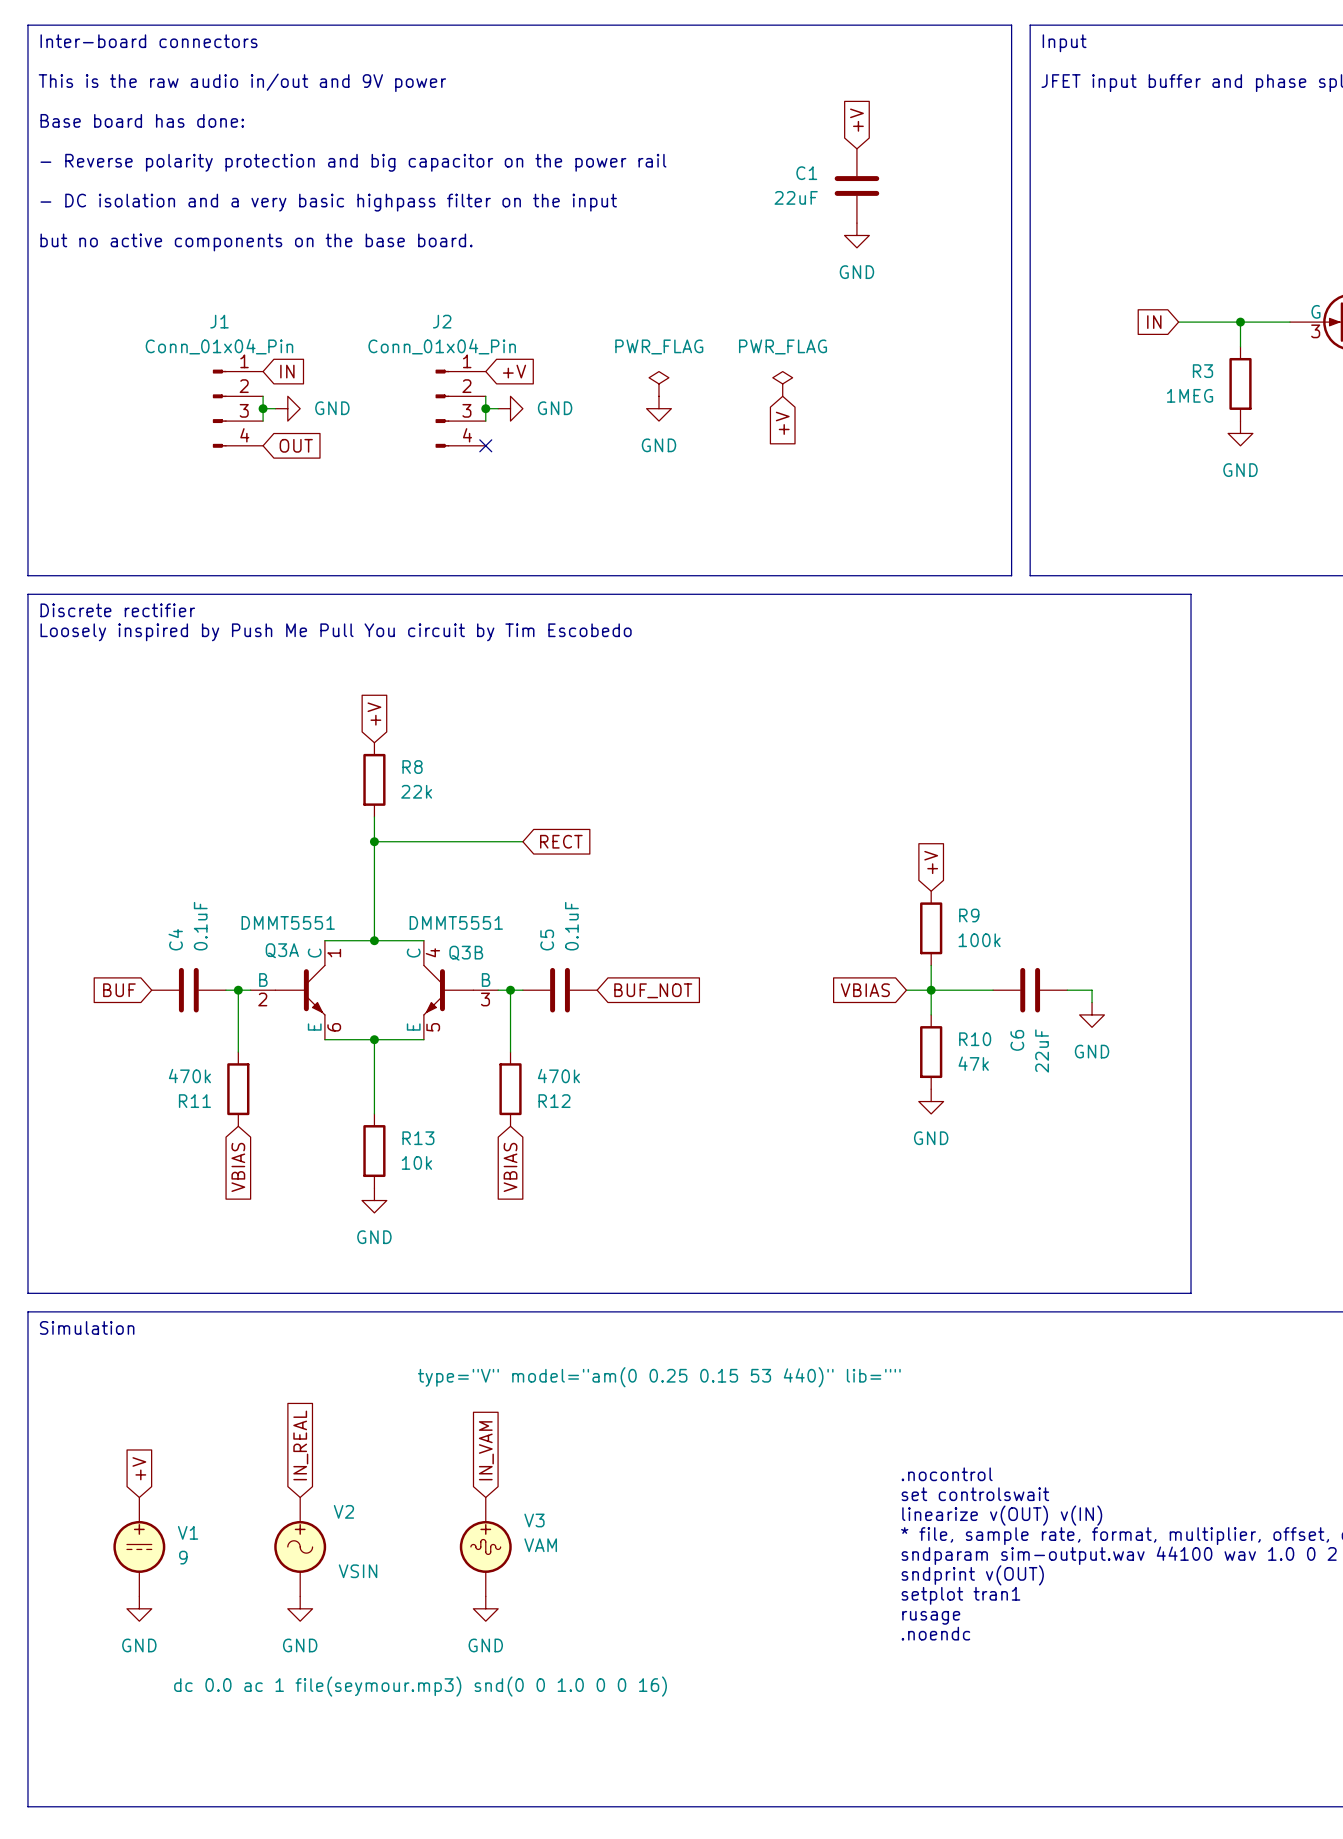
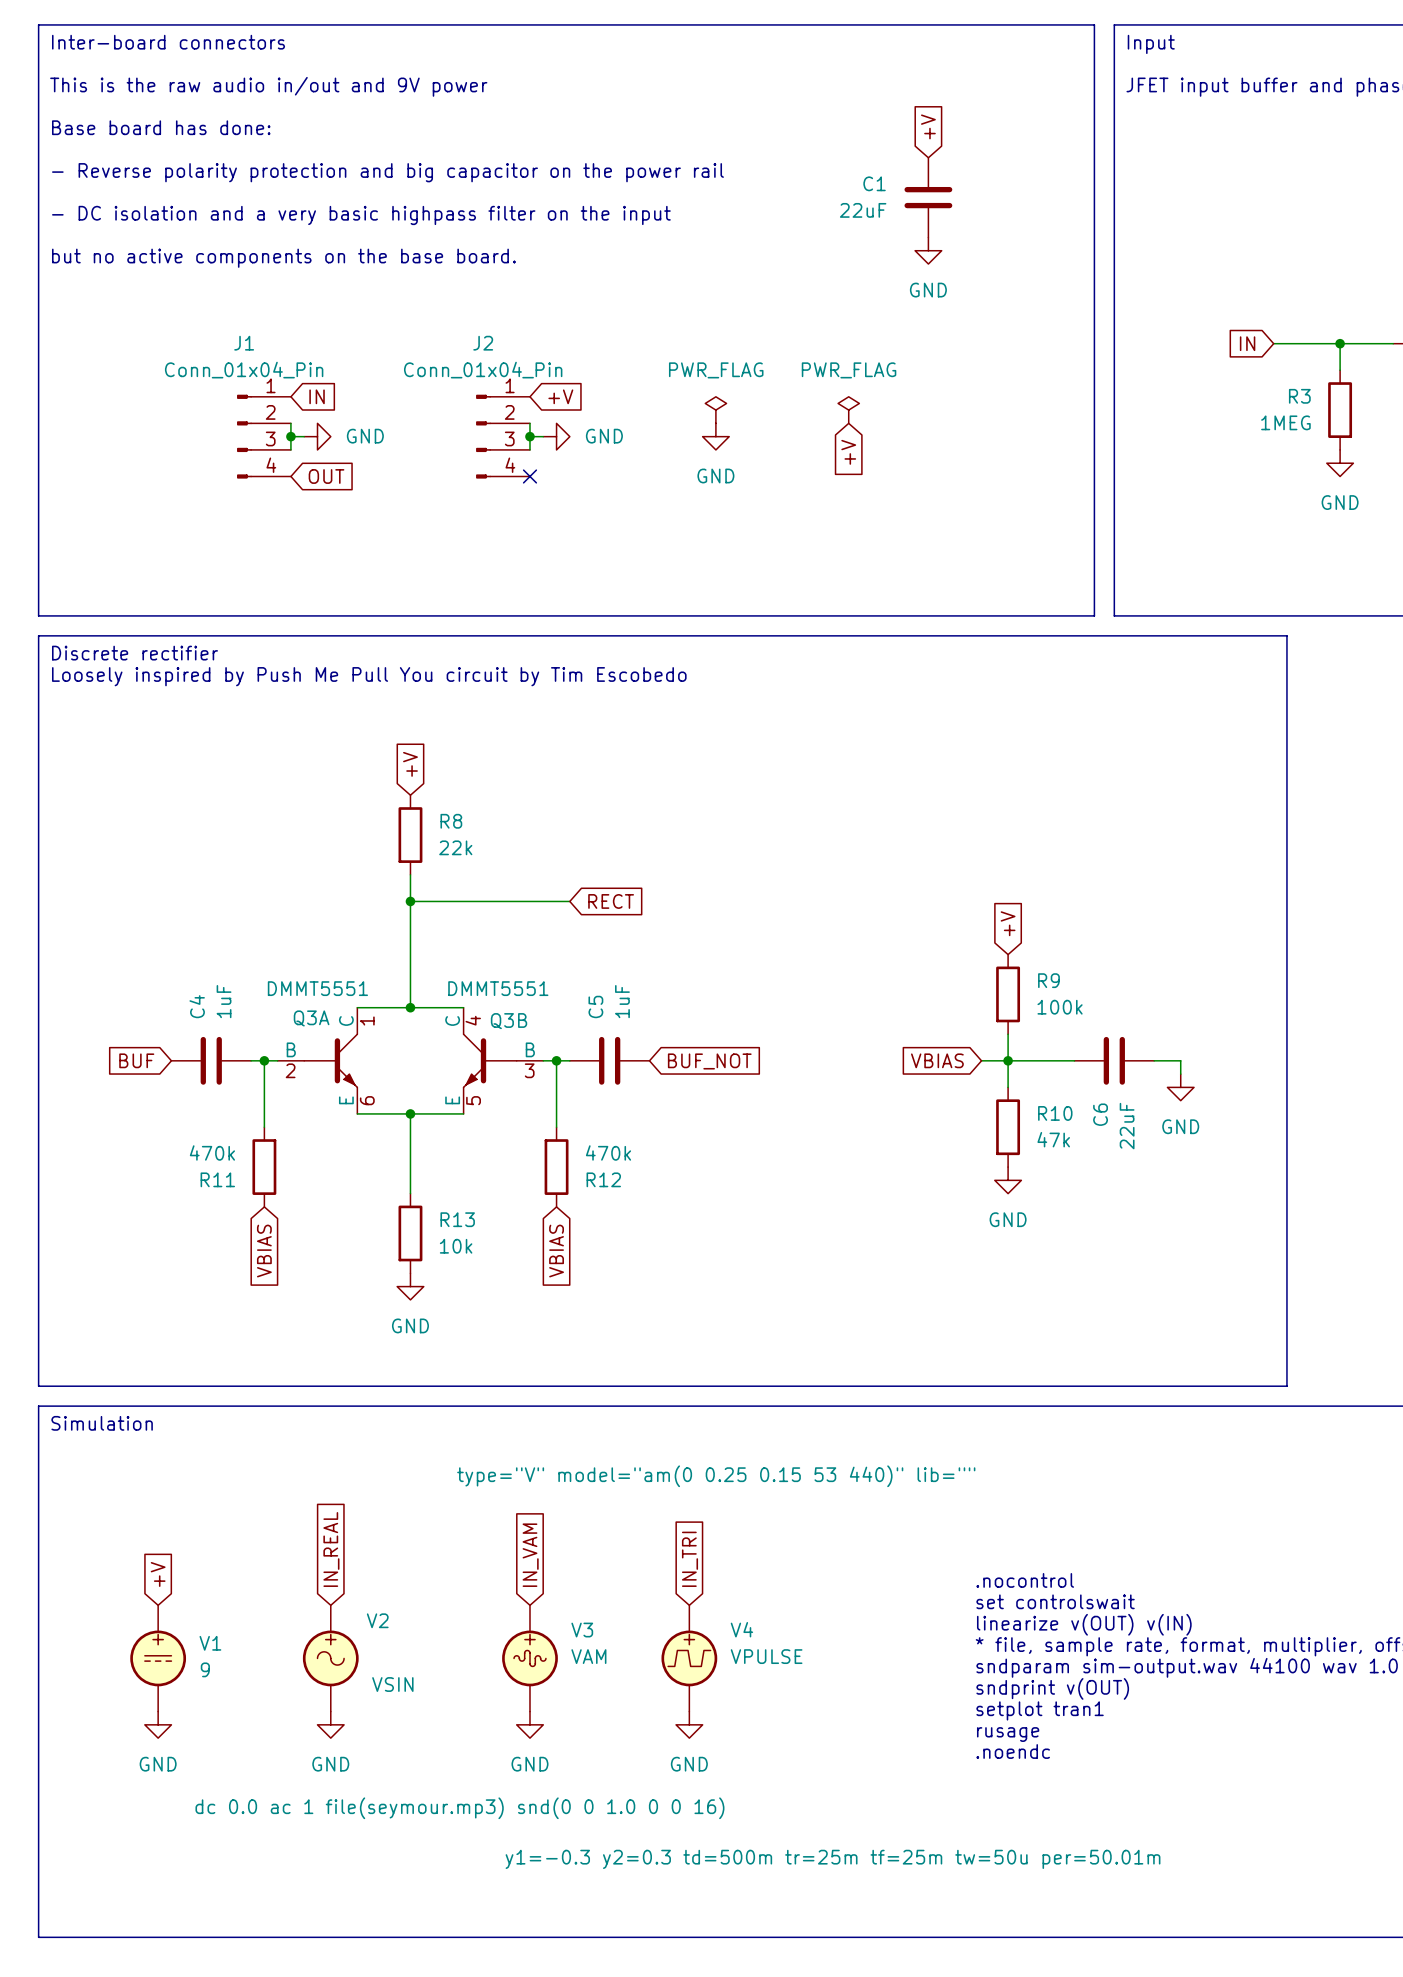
C4 value: 0.1uF (200, 926) -> 1uF (224, 1001)
C5 value: 0.1uF (571, 926) -> 1uF (622, 1001)
global label: none -> IN_TRI (689, 1559)
V4: none -> VPULSE (689, 1658)
power symbol: none -> GND (689, 1724)

